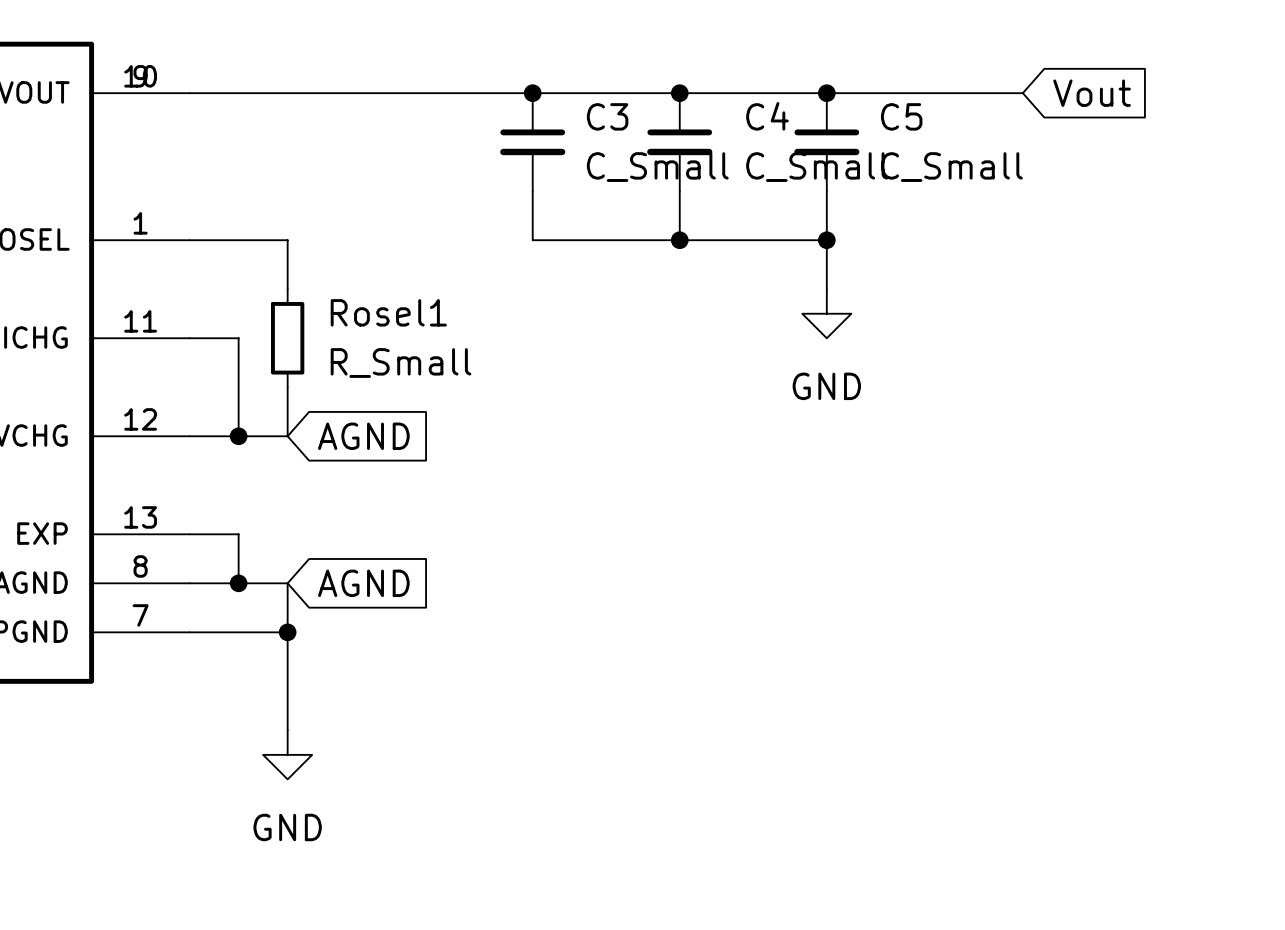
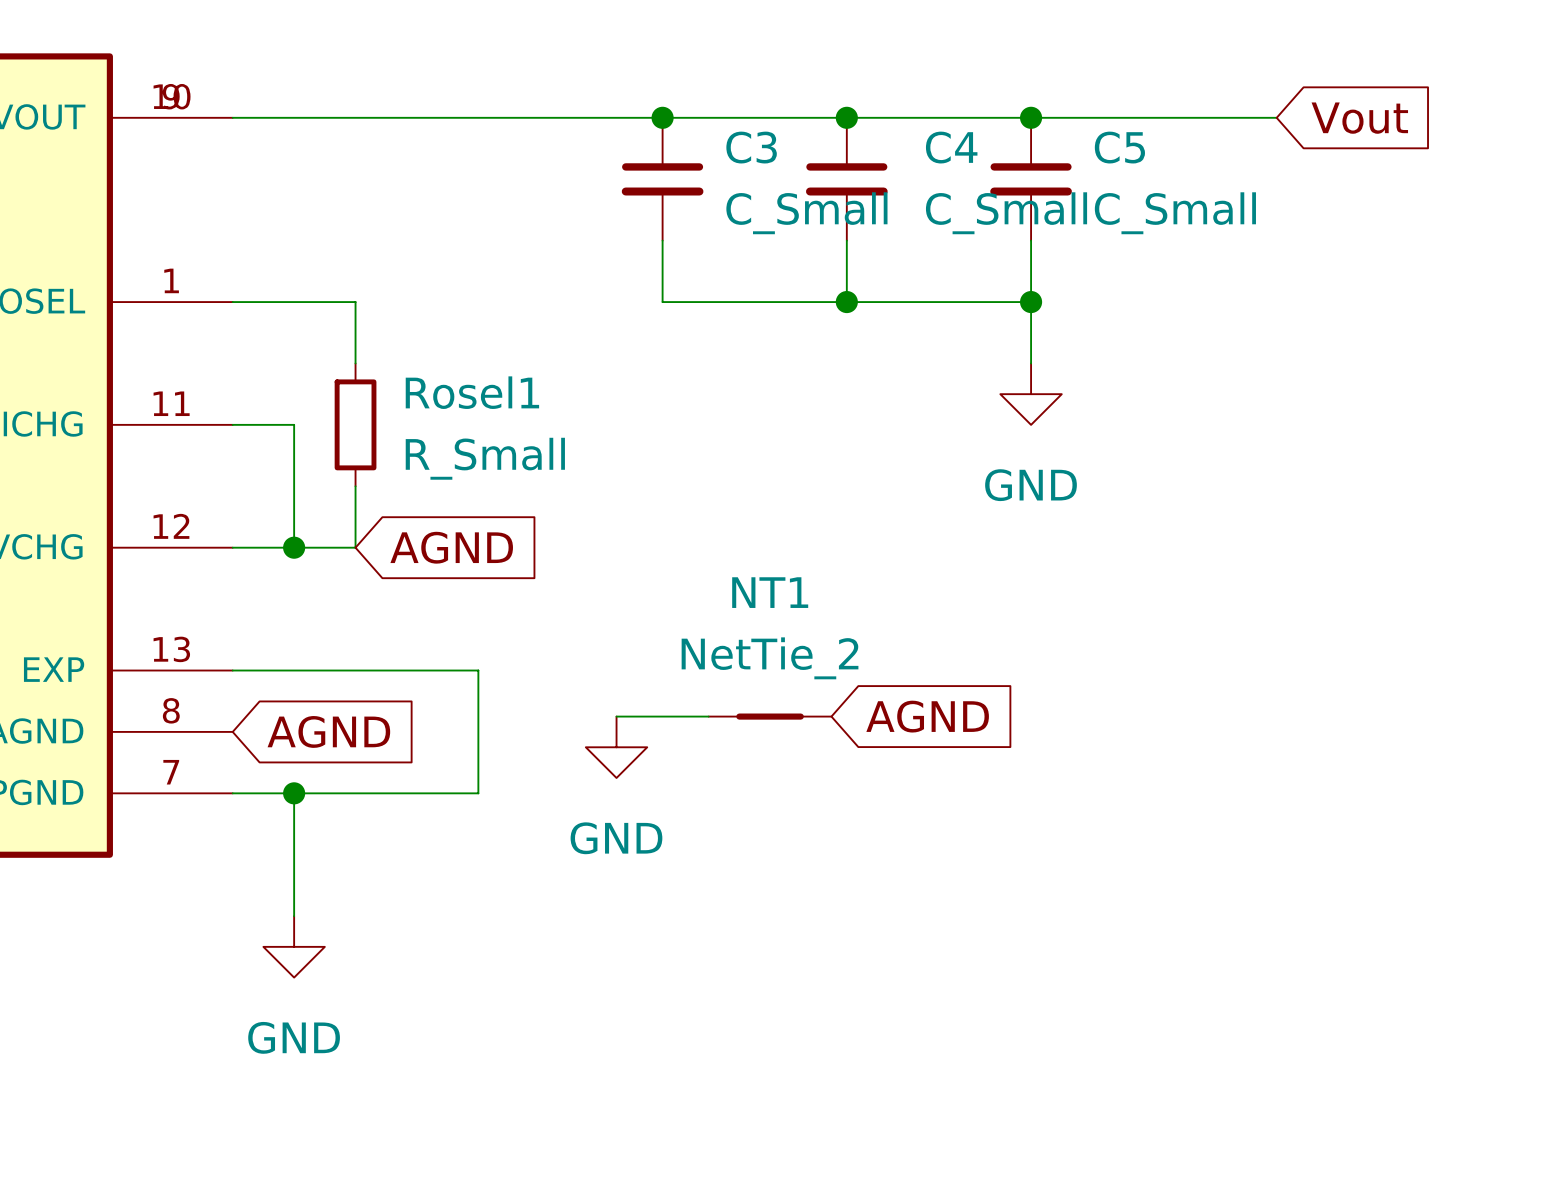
wire: (238, 534) (238, 583) -> (294, 670) (478, 670) (478, 793) (355, 793)
wire: none -> (616, 716) (708, 716)
NT1: none -> NetTie_2 (770, 716)
global label: none -> AGND (927, 716)
wire: (189, 583) (287, 583) (287, 730) -> none
junction: (238, 583) -> none
global label position: AGND (363, 583) -> AGND (328, 731)
power symbol: none -> GND (616, 747)
wire: none -> (294, 793) (294, 916)
junction: none -> (294, 793)
junction: (287, 632) -> none
power symbol position: GND (287, 754) -> GND (294, 946)

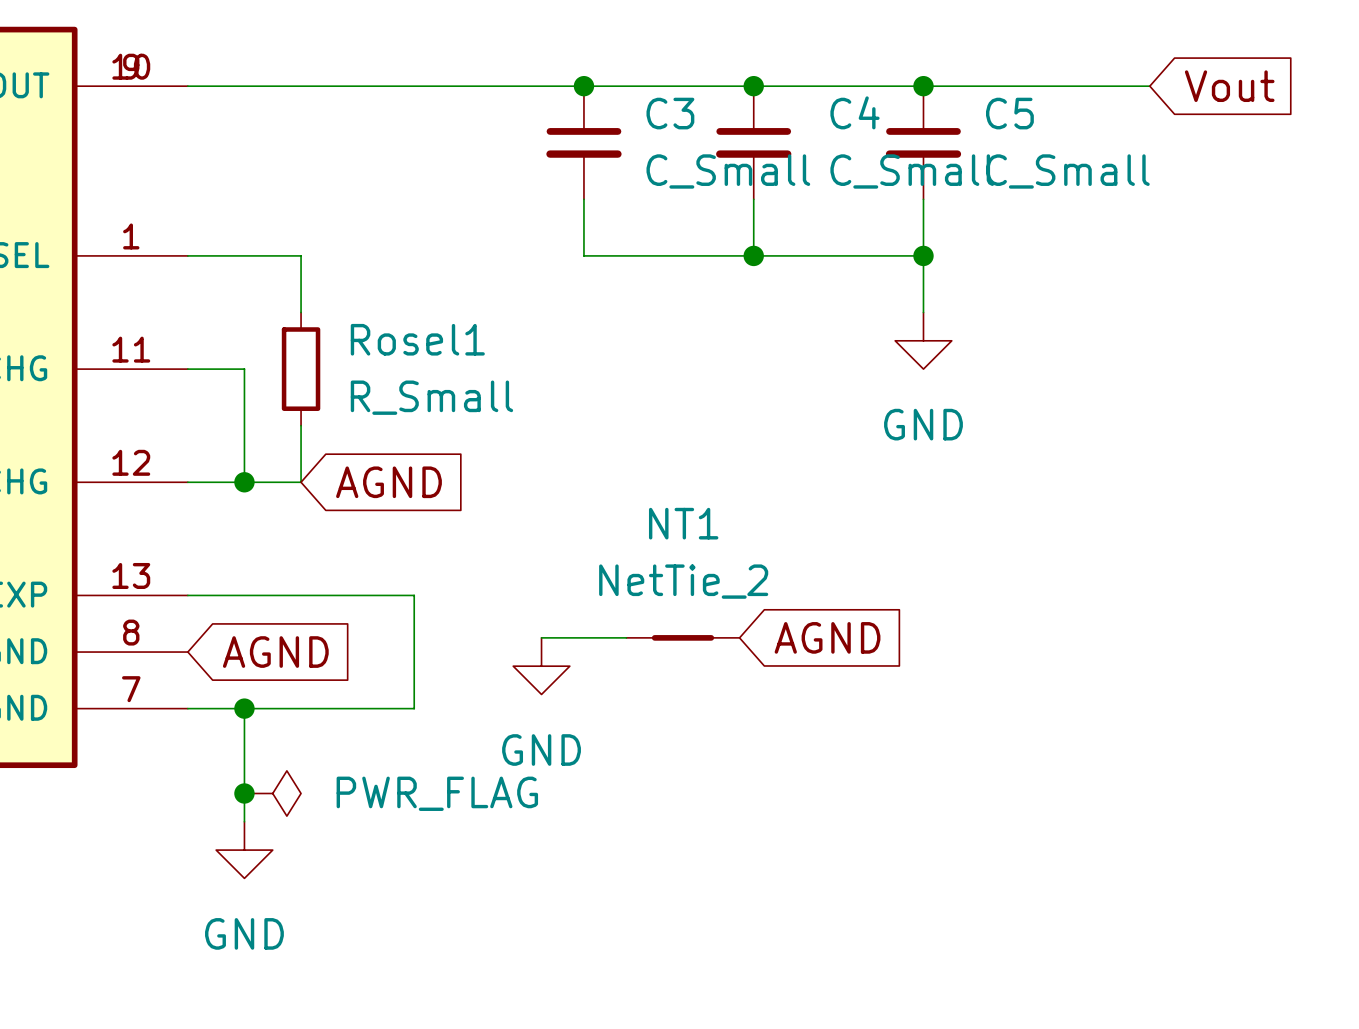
junction: none -> (244, 793)
power symbol: none -> PWR_FLAG (272, 793)

